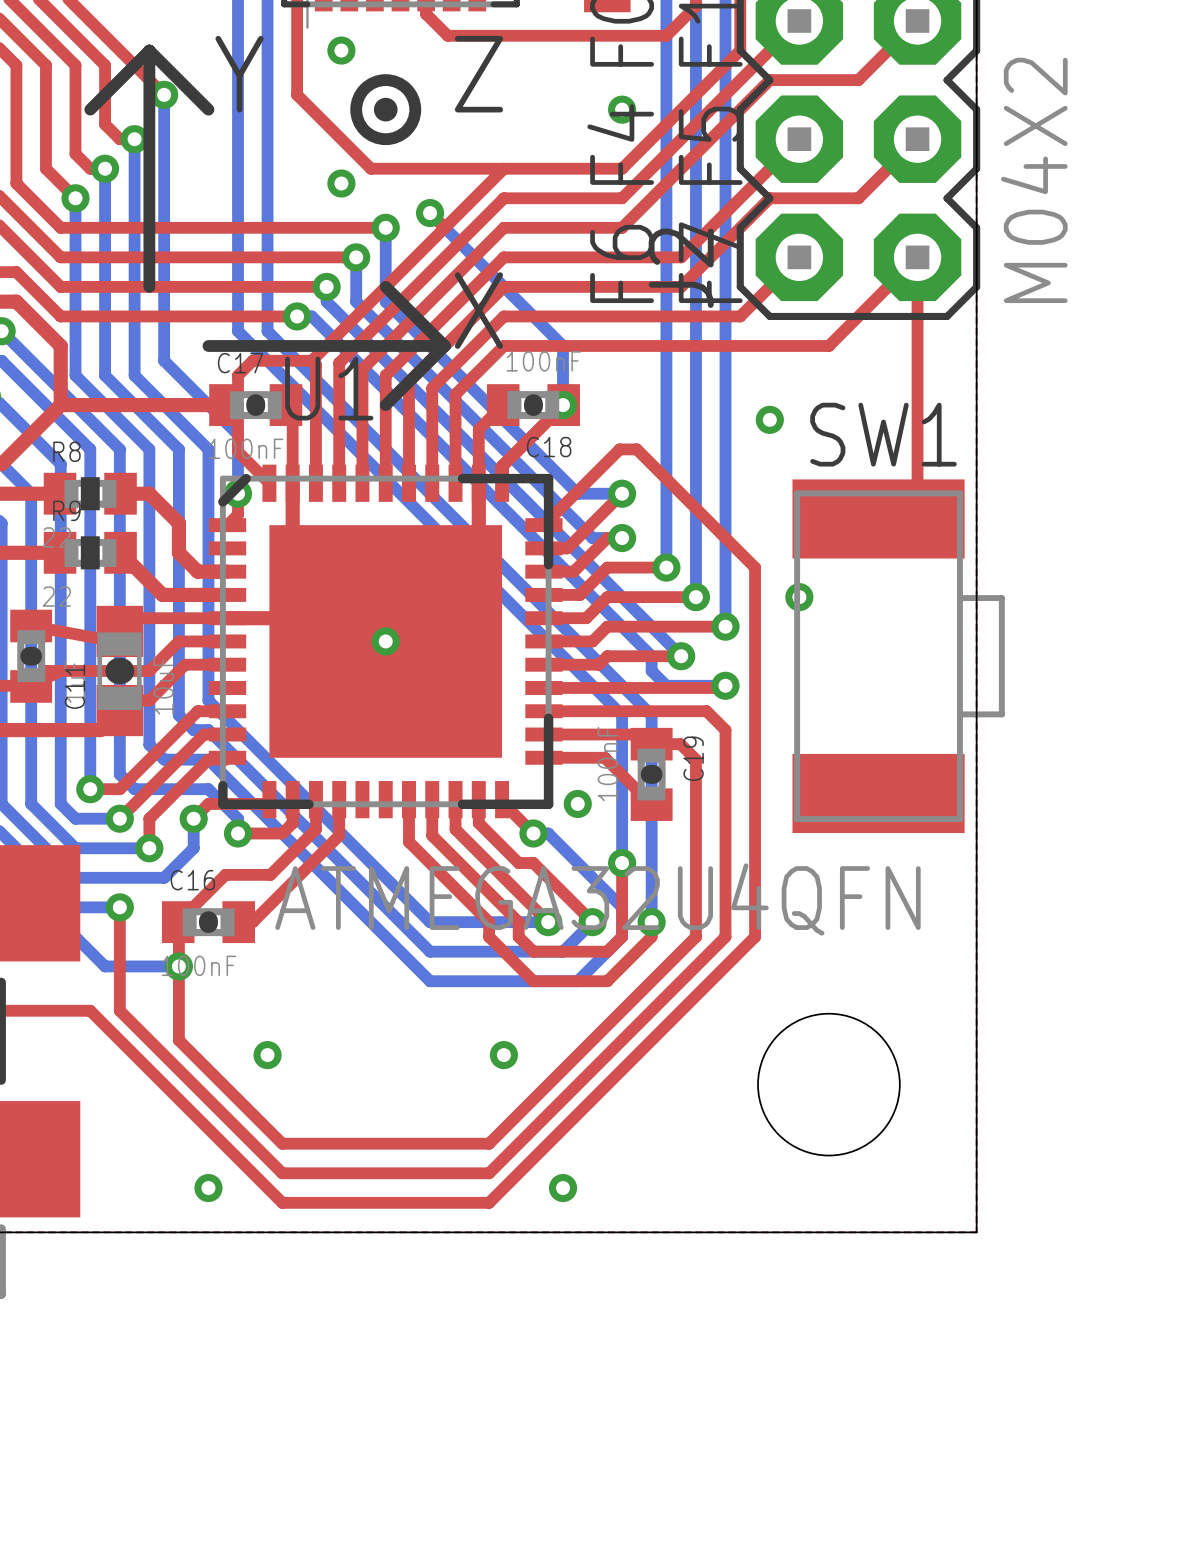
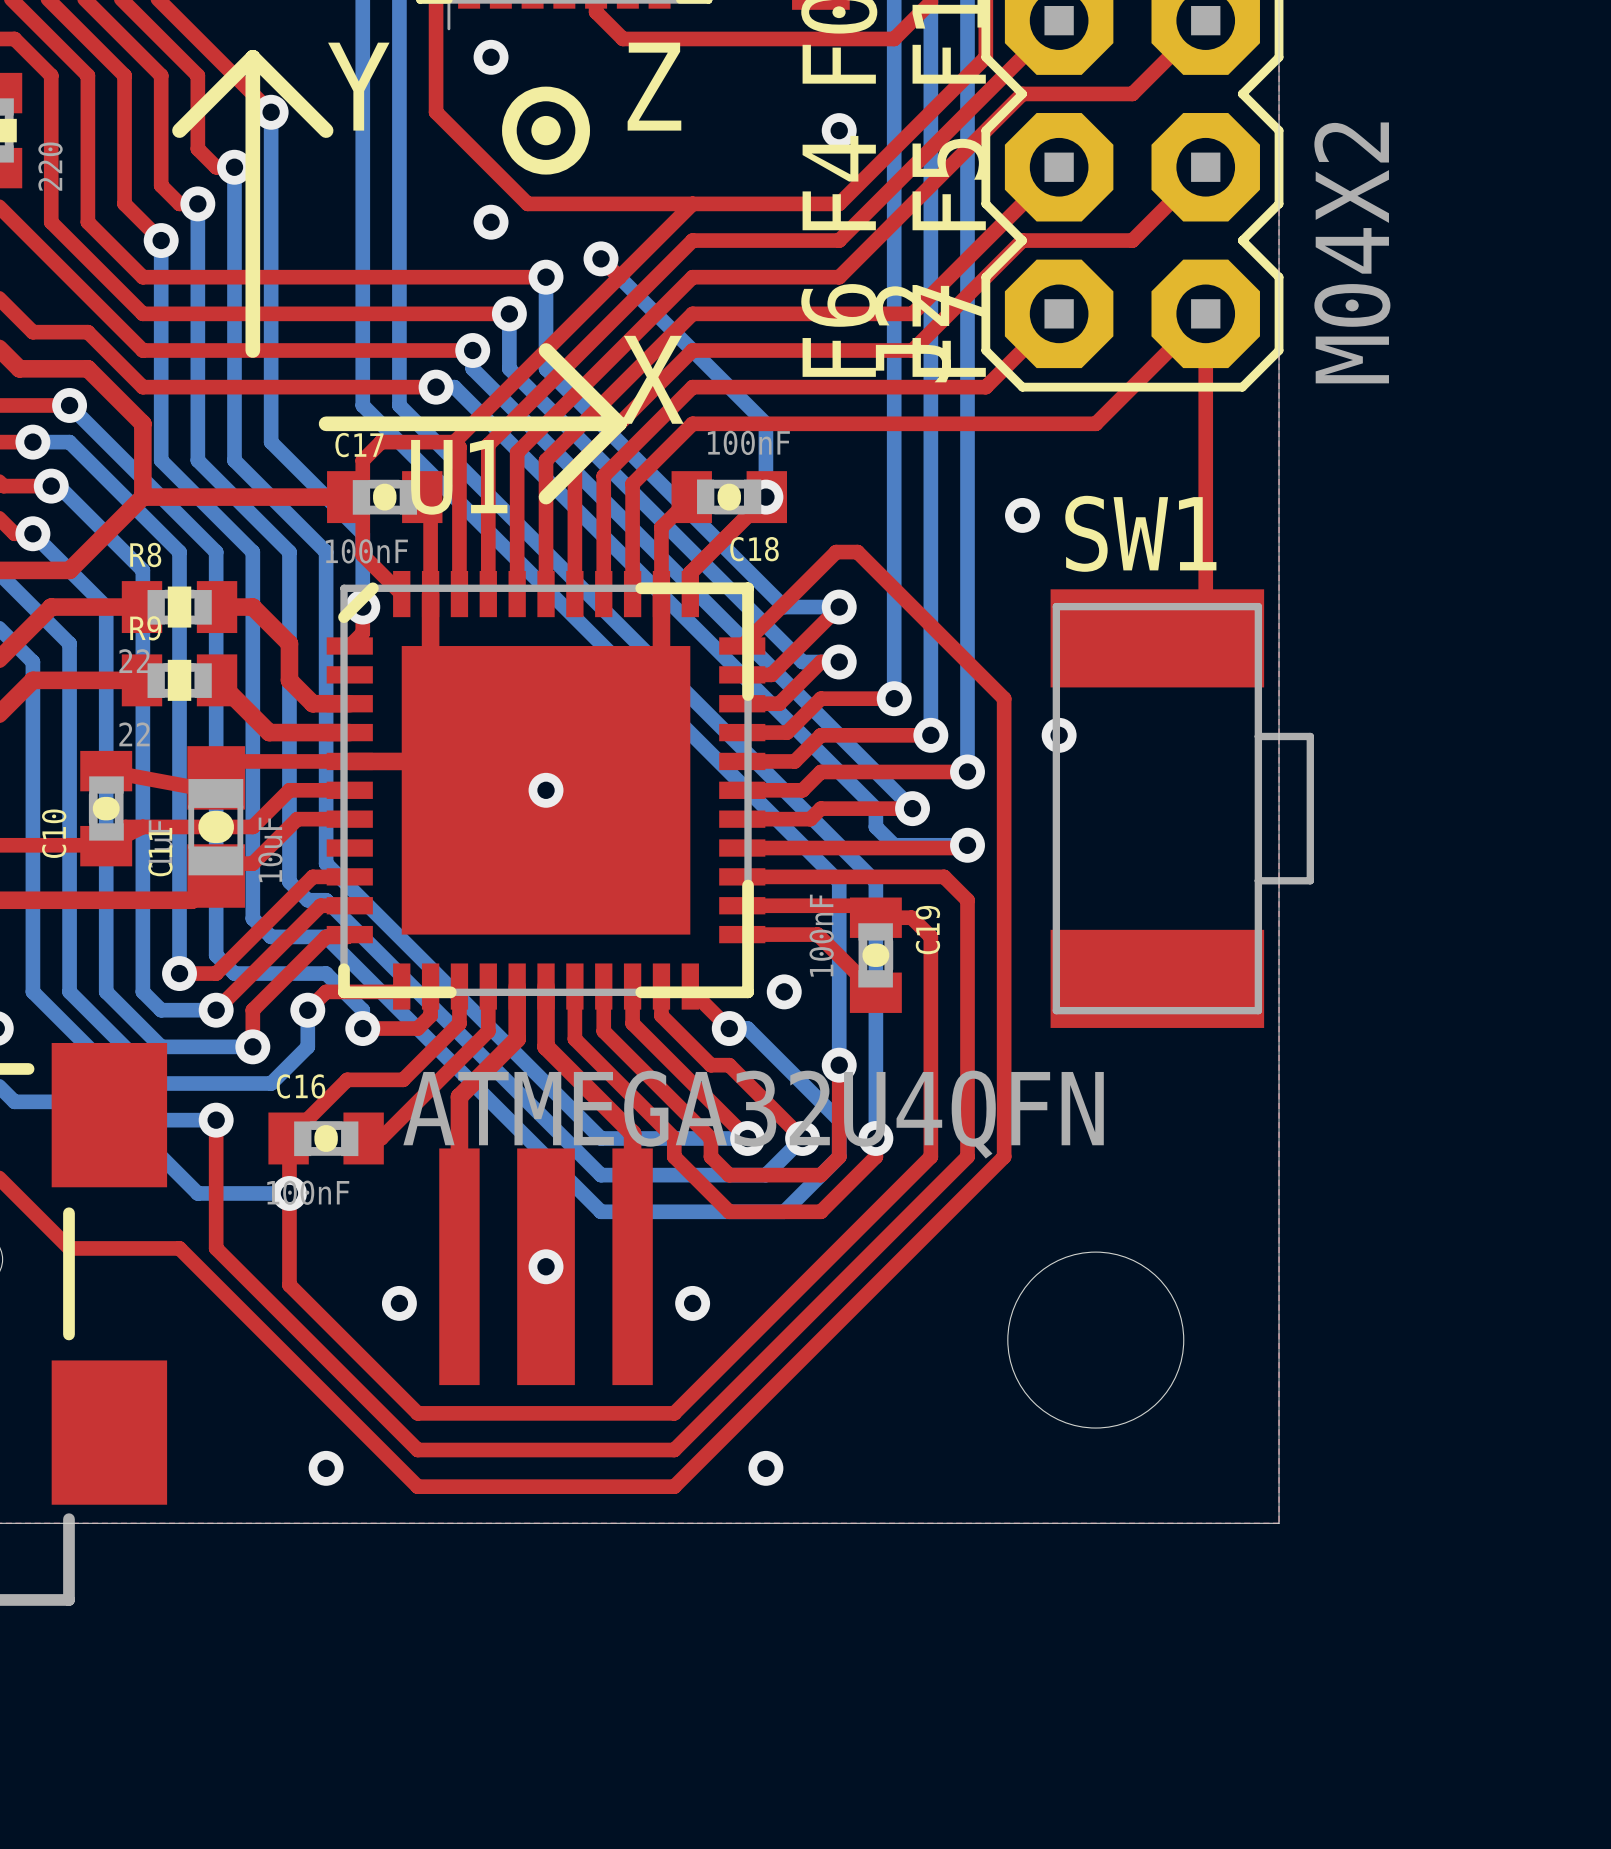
top track: none -> (517, 986) (517, 1039) (459, 1096) (459, 1266)
top track: none -> (546, 986) (546, 1046) (632, 1133) (632, 1266)
part: none -> (546, 1266)
via: none -> (546, 1266)

